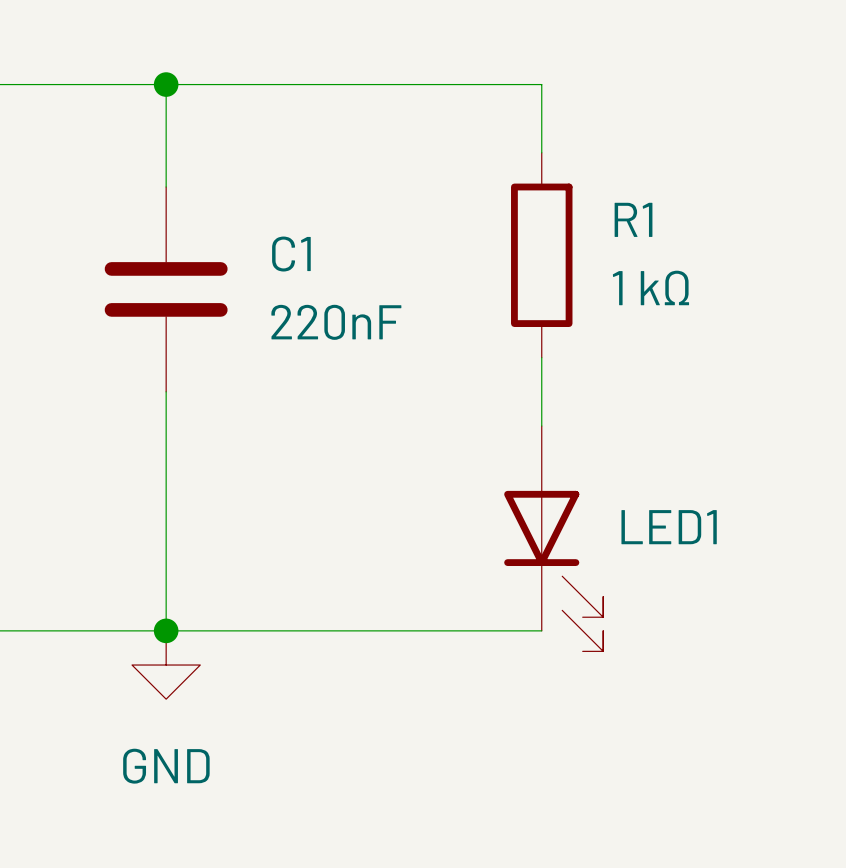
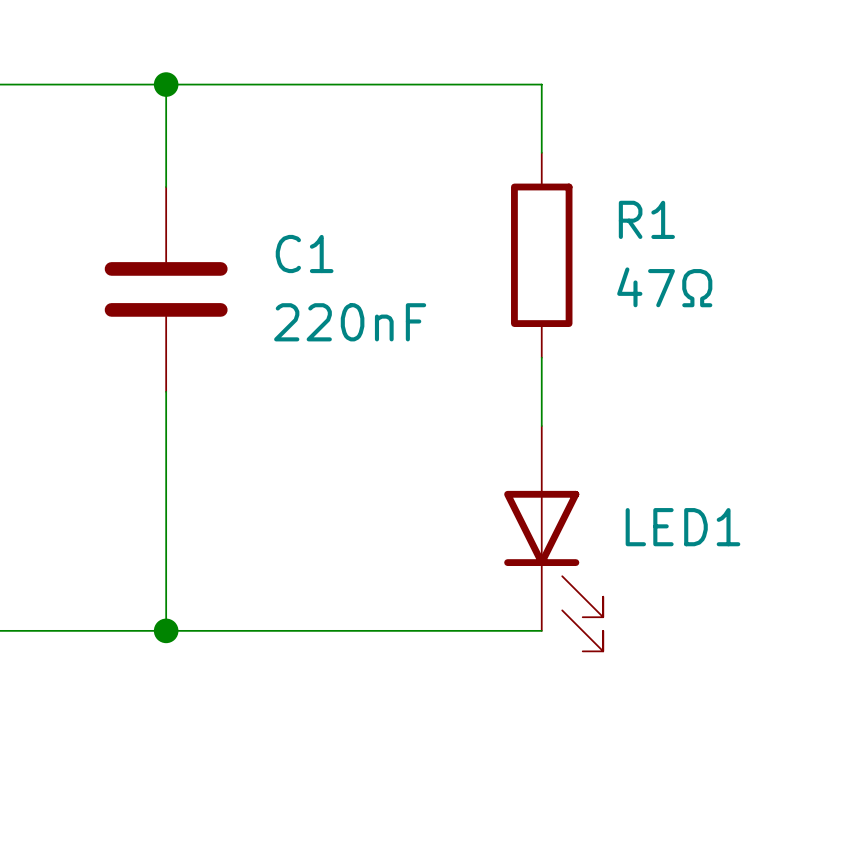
R1 value: 1 kΩ (650, 287) -> 47Ω (664, 287)
power symbol: GND (166, 665) -> none

